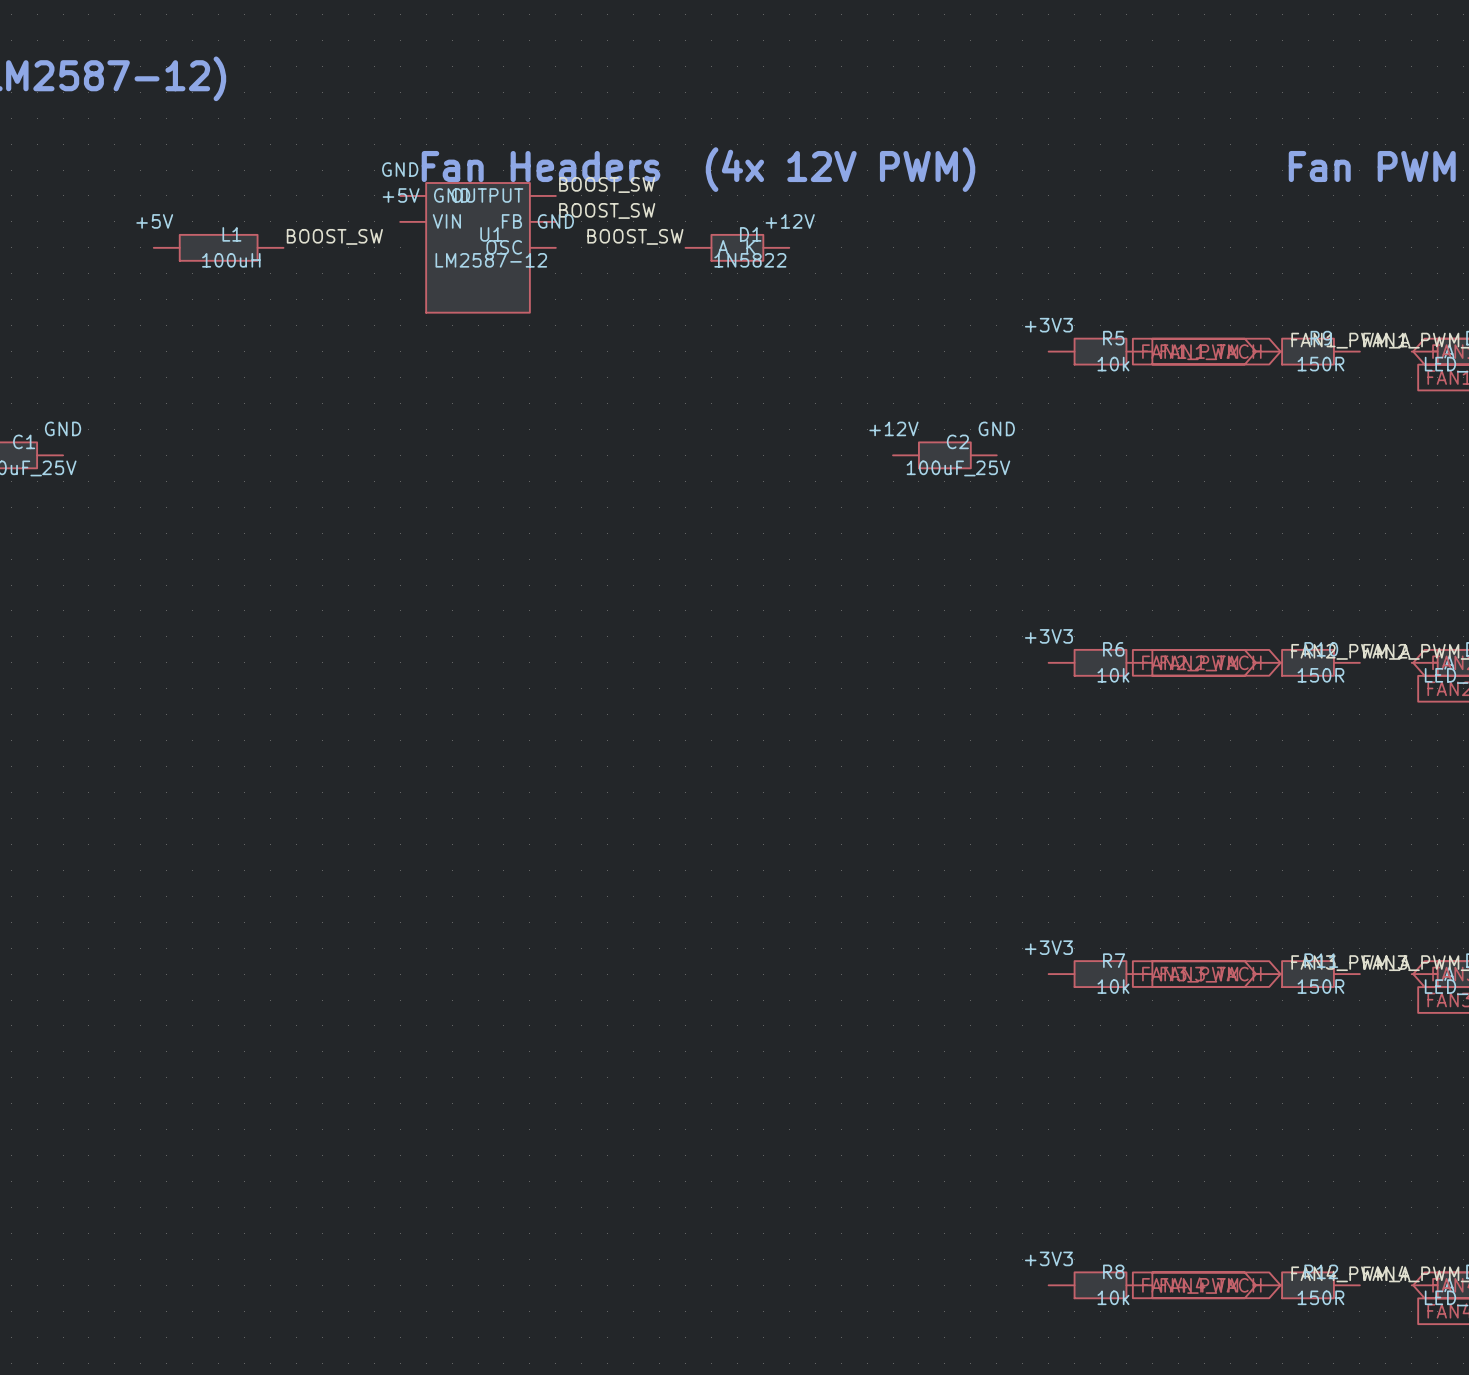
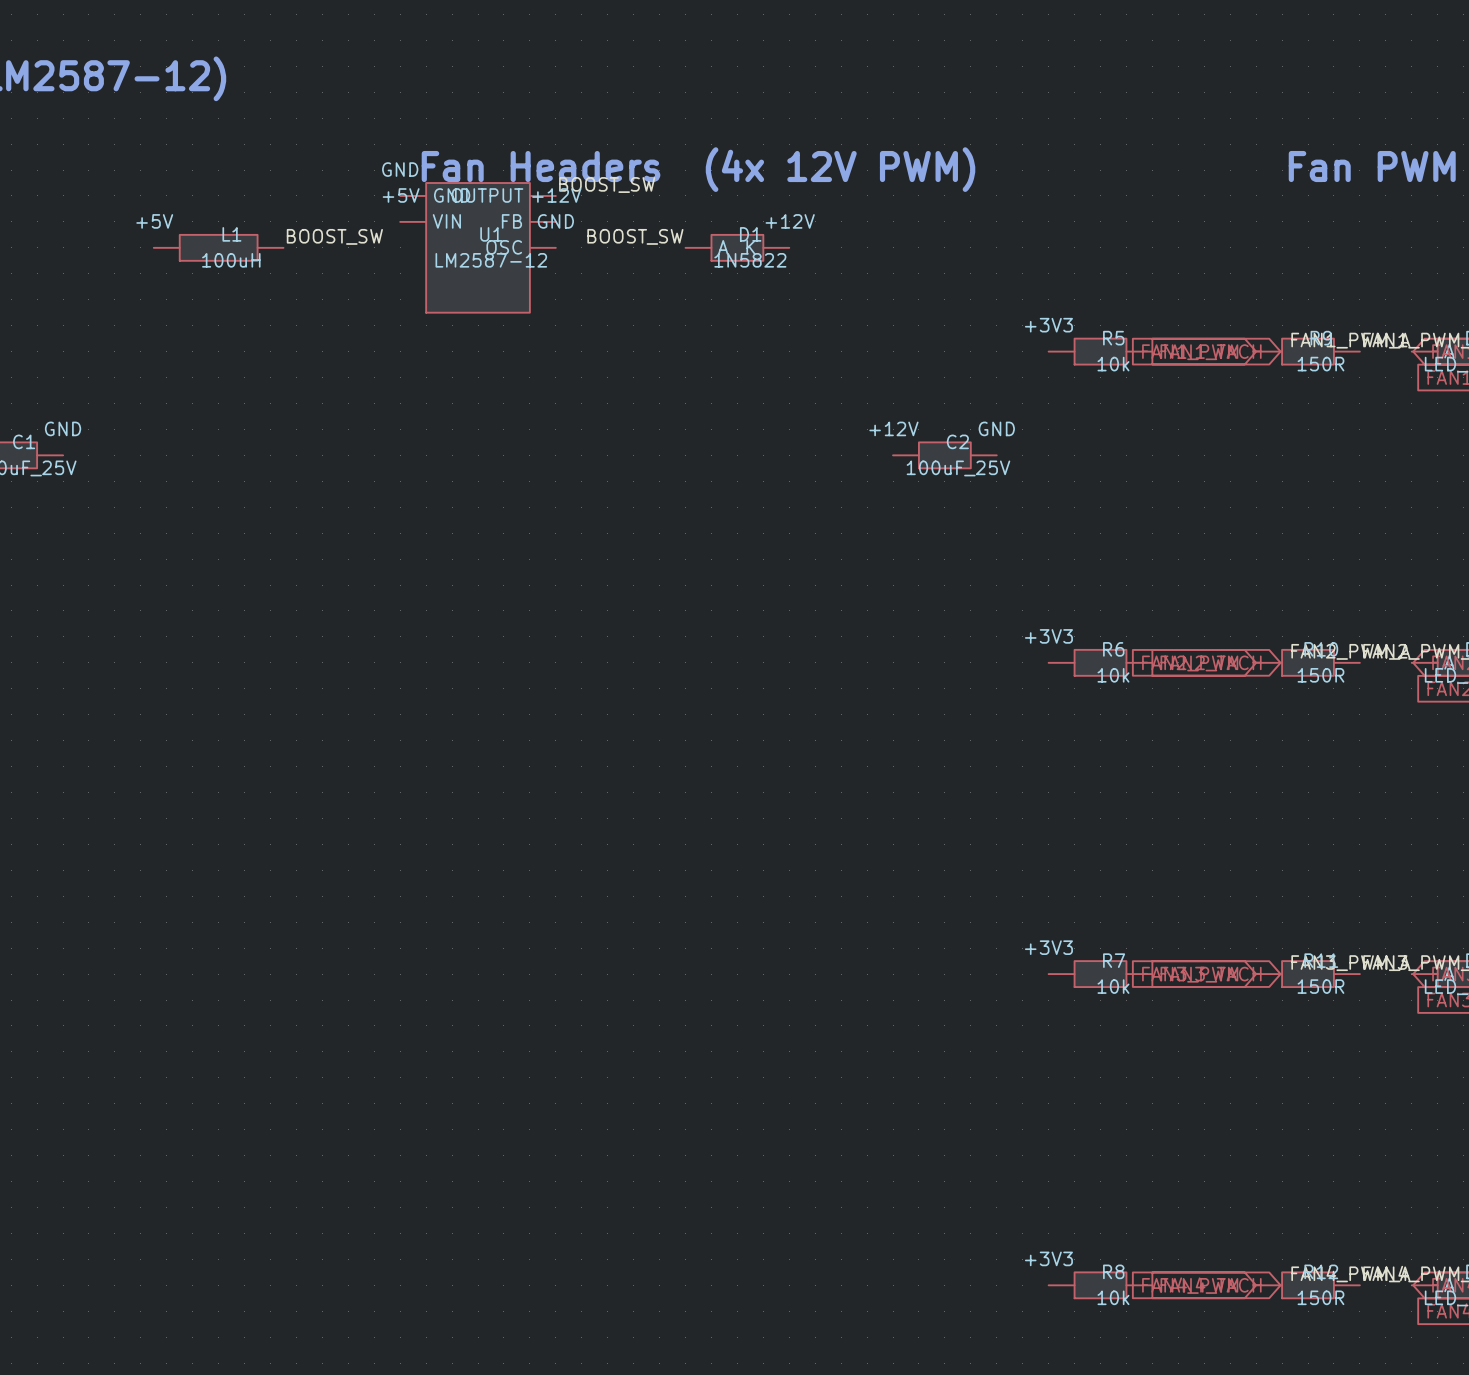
power symbol: none -> +12V (556, 195)
label: BOOST_SW (607, 210) -> none

